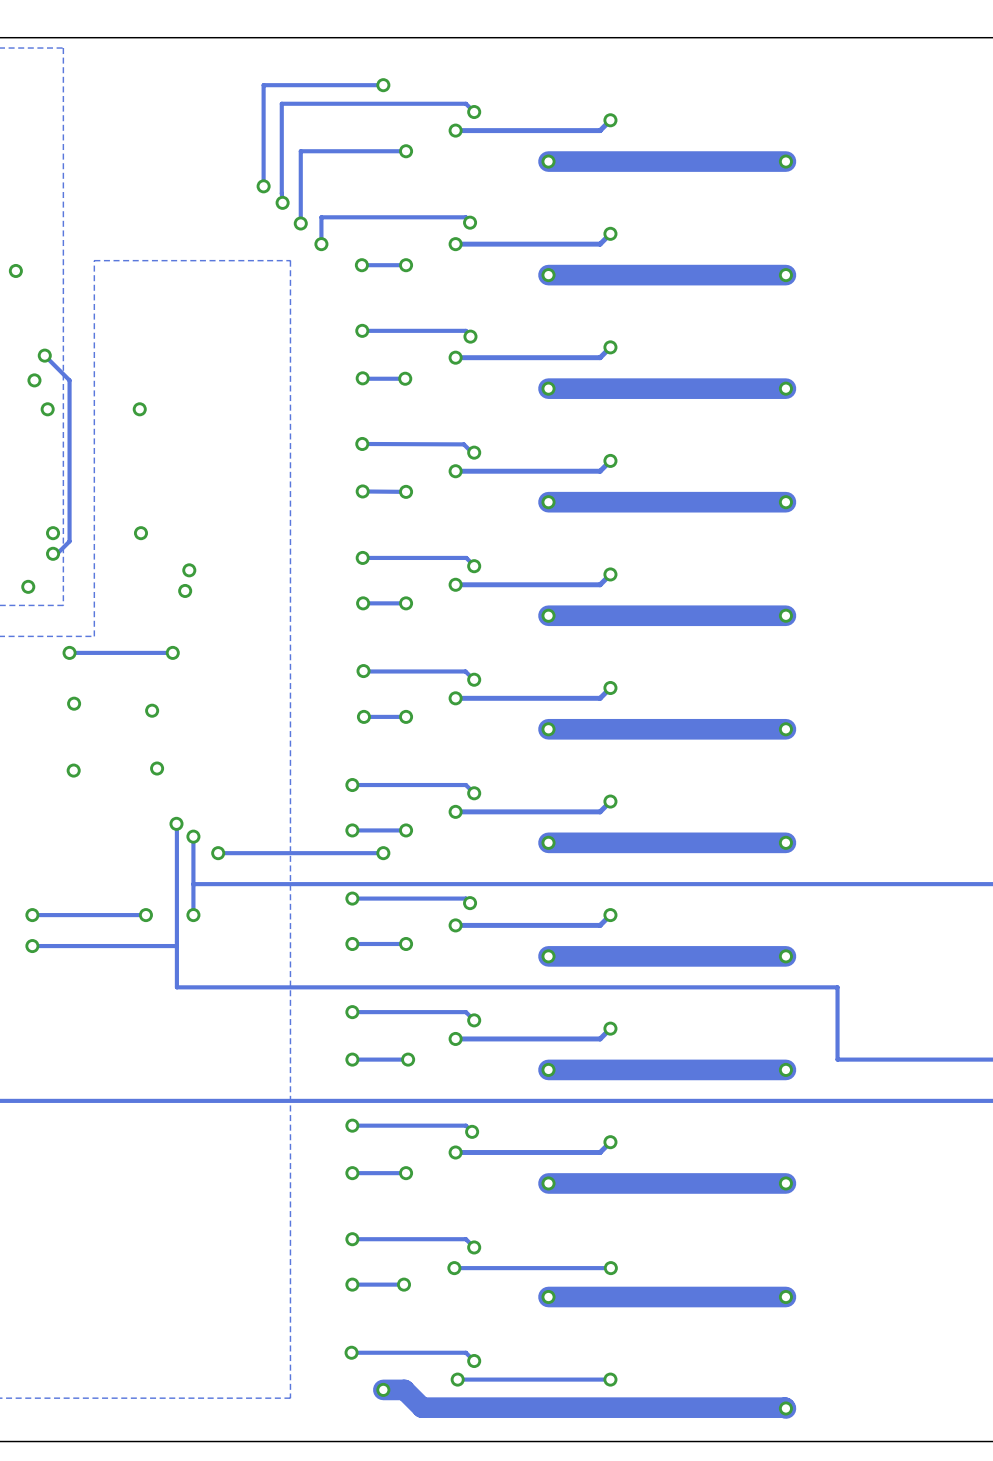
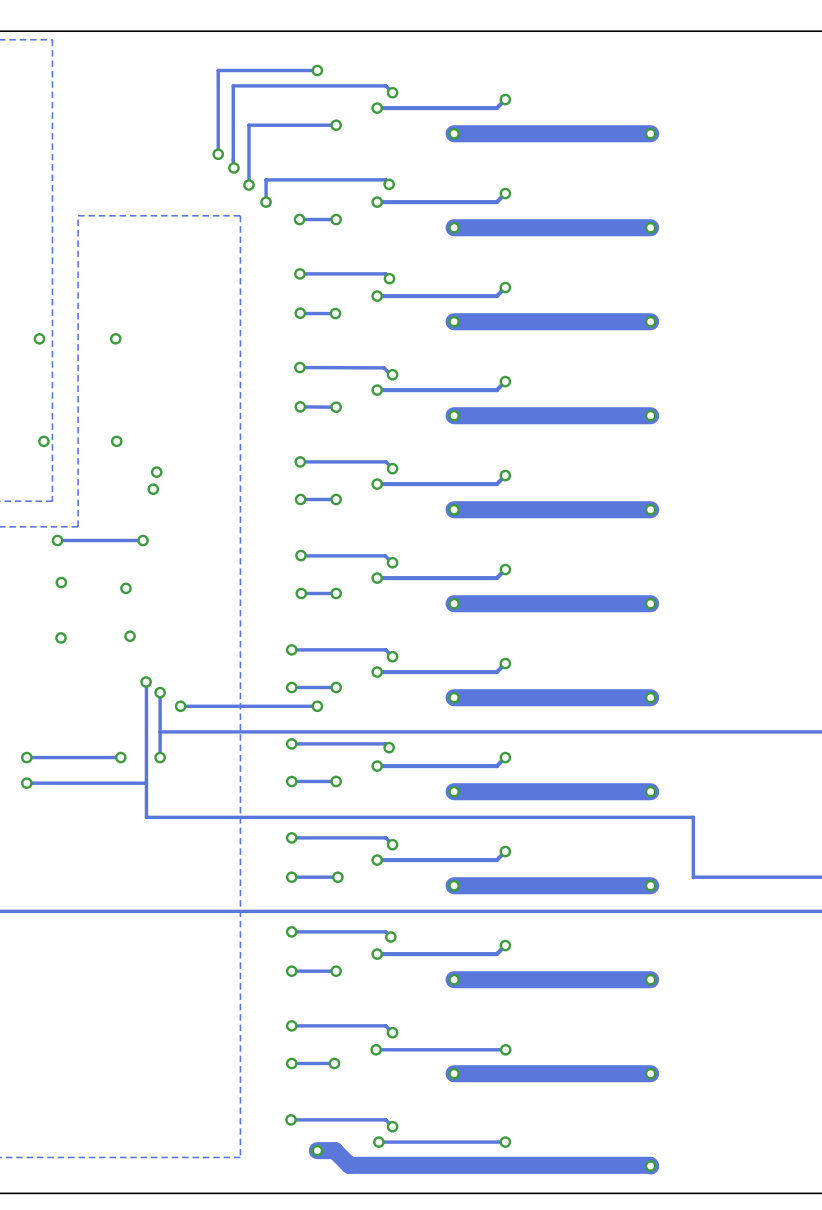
via: (15, 270) -> none
track: (44, 355) (69, 380) (69, 541) (57, 553) (53, 553) -> none
via: (44, 355) -> none
via: (34, 380) -> none
via: (53, 553) -> none
via: (28, 586) -> none

